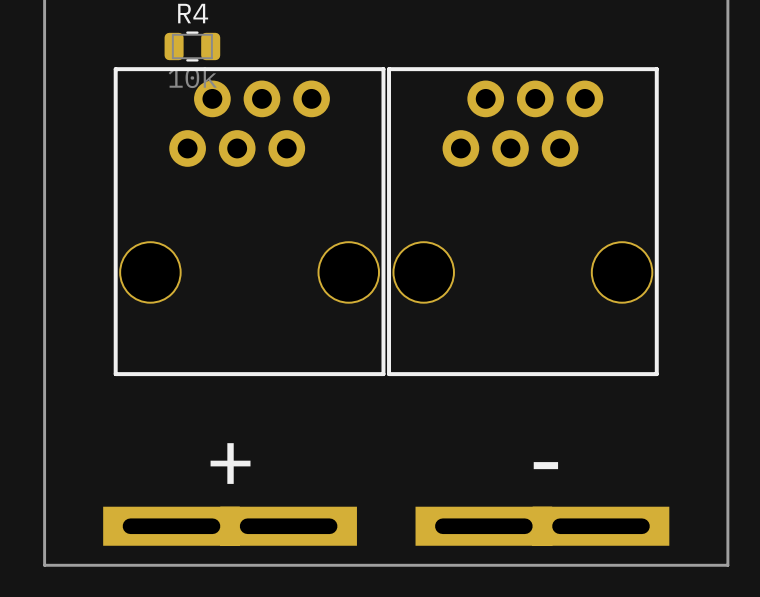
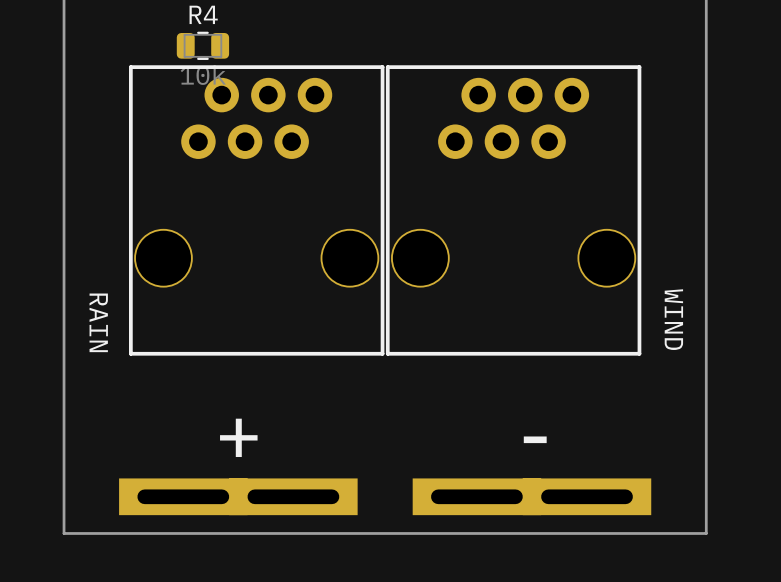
text: none -> WIND (673, 319)
text: none -> RAIN (98, 322)

